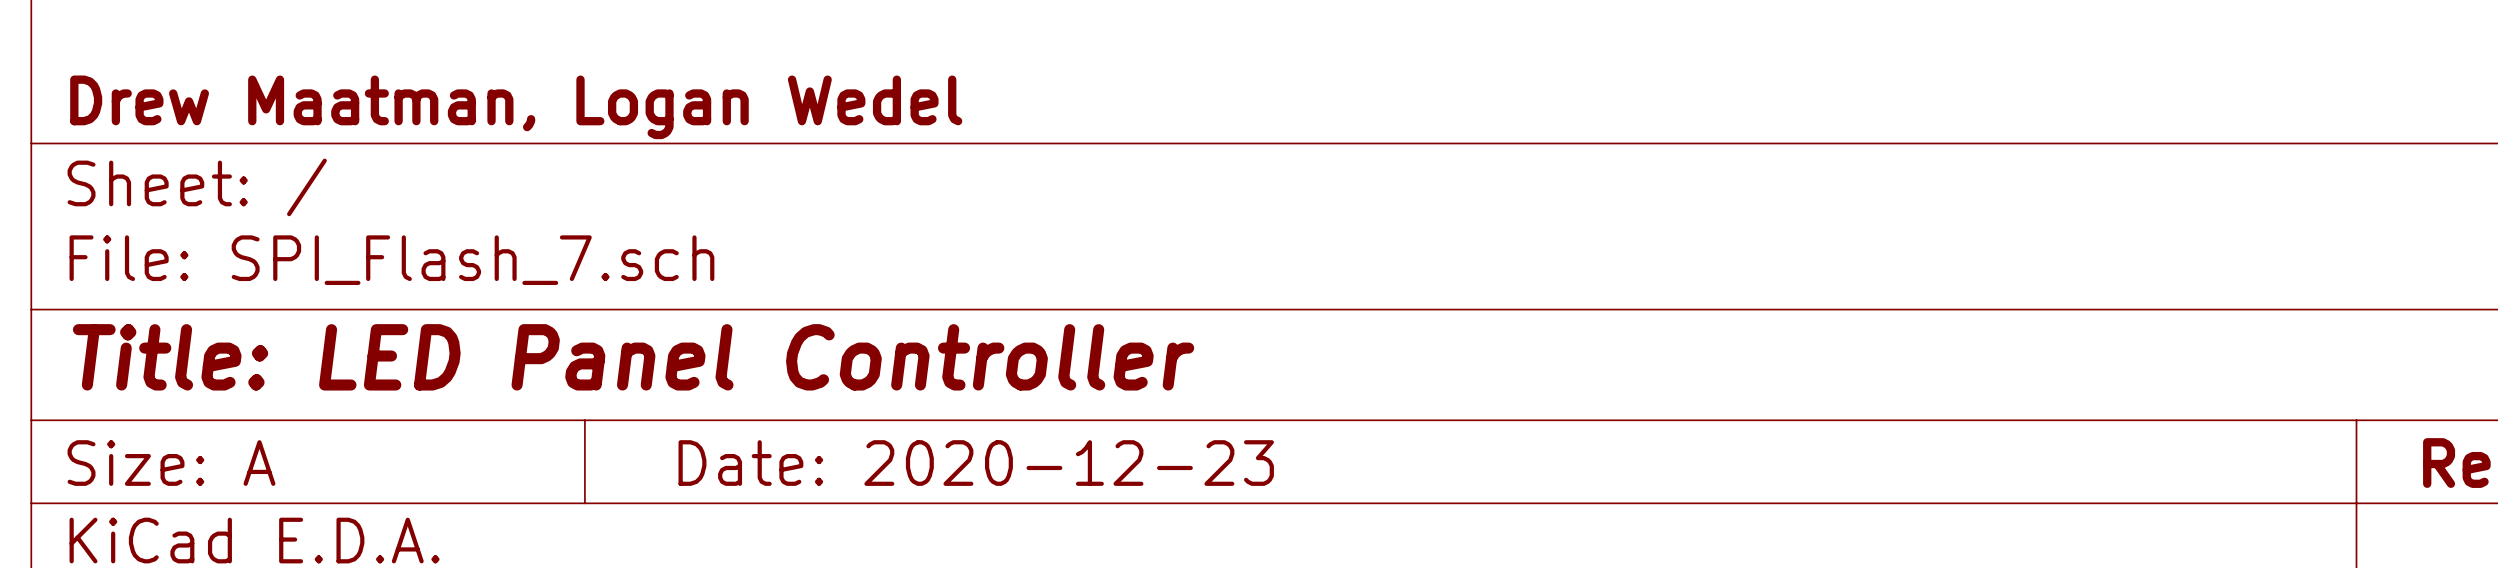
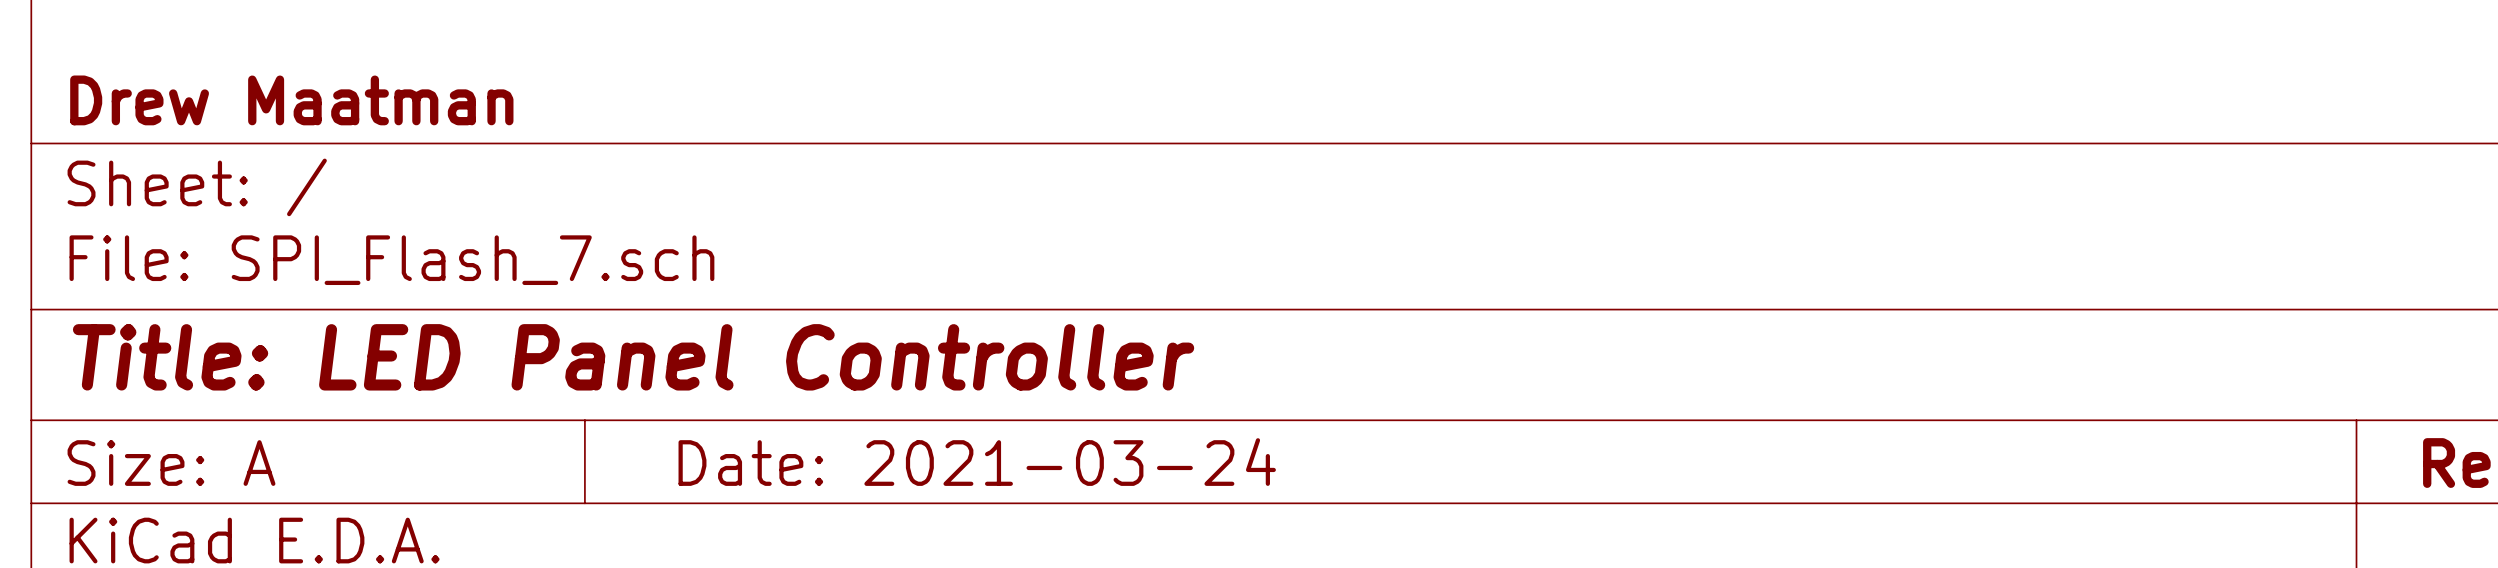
title block: Drew Maatman, Logan Wedel (516, 107) -> Drew Maatman (291, 100)
title block: Date: 2020-12-23 (976, 463) -> Date: 2021-03-24 (977, 462)

